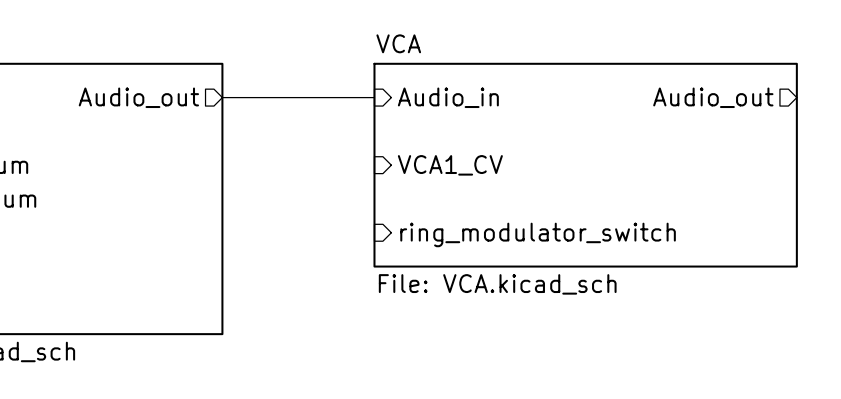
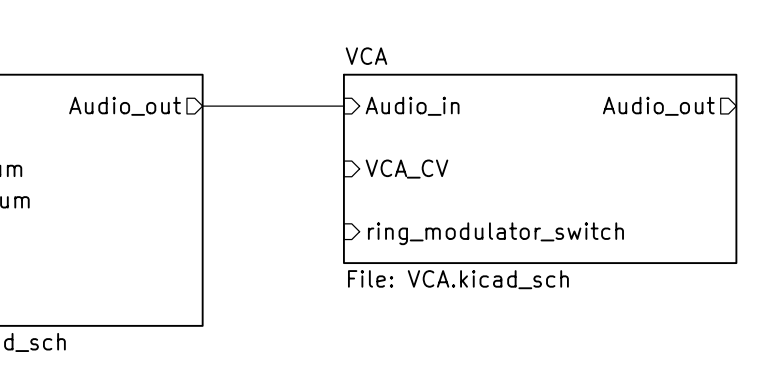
sheet pin: VCA1_CV (450, 165) -> VCA_CV (406, 169)

